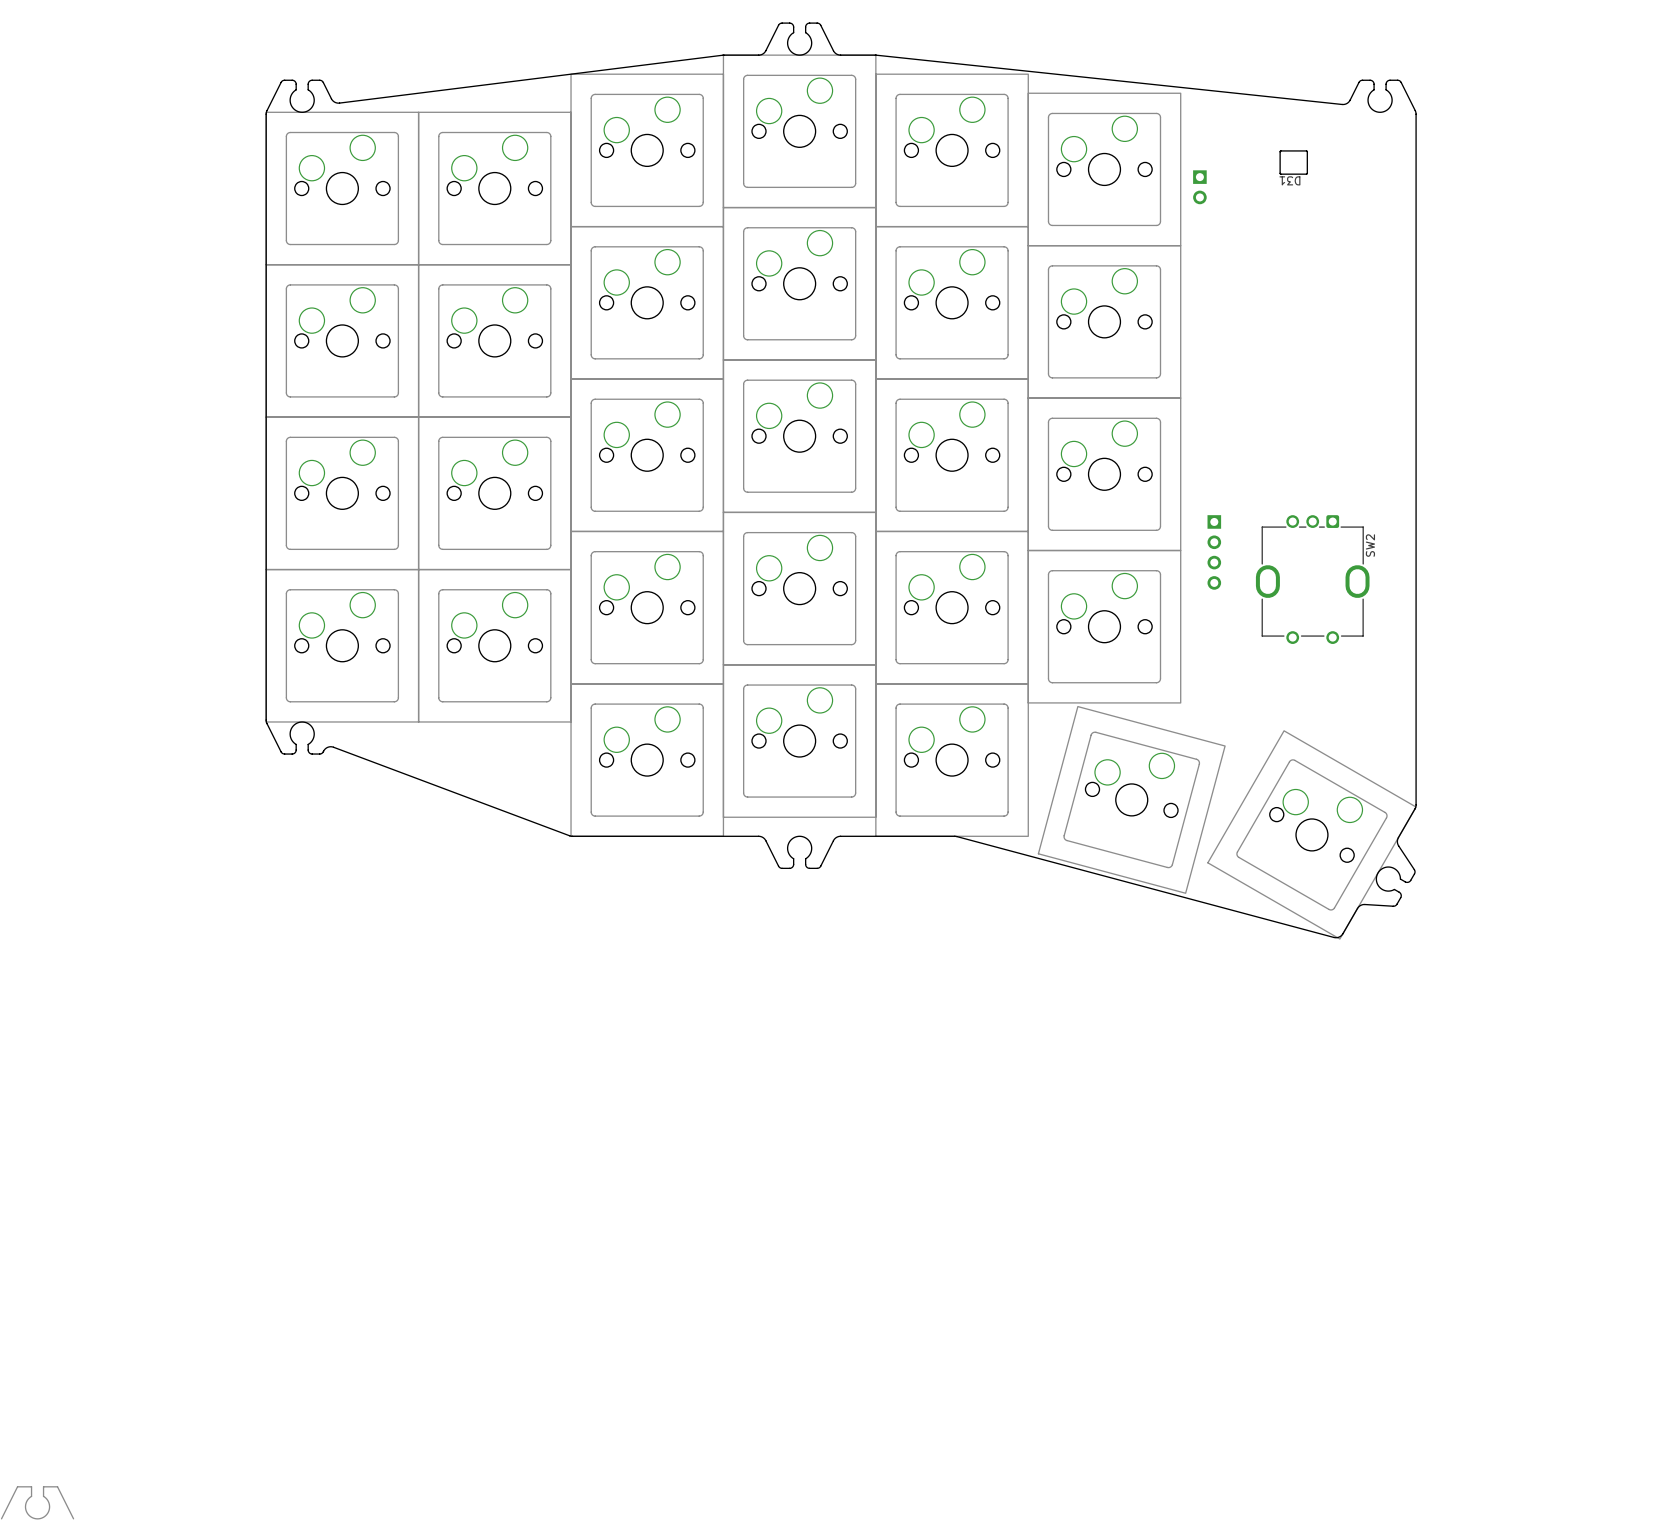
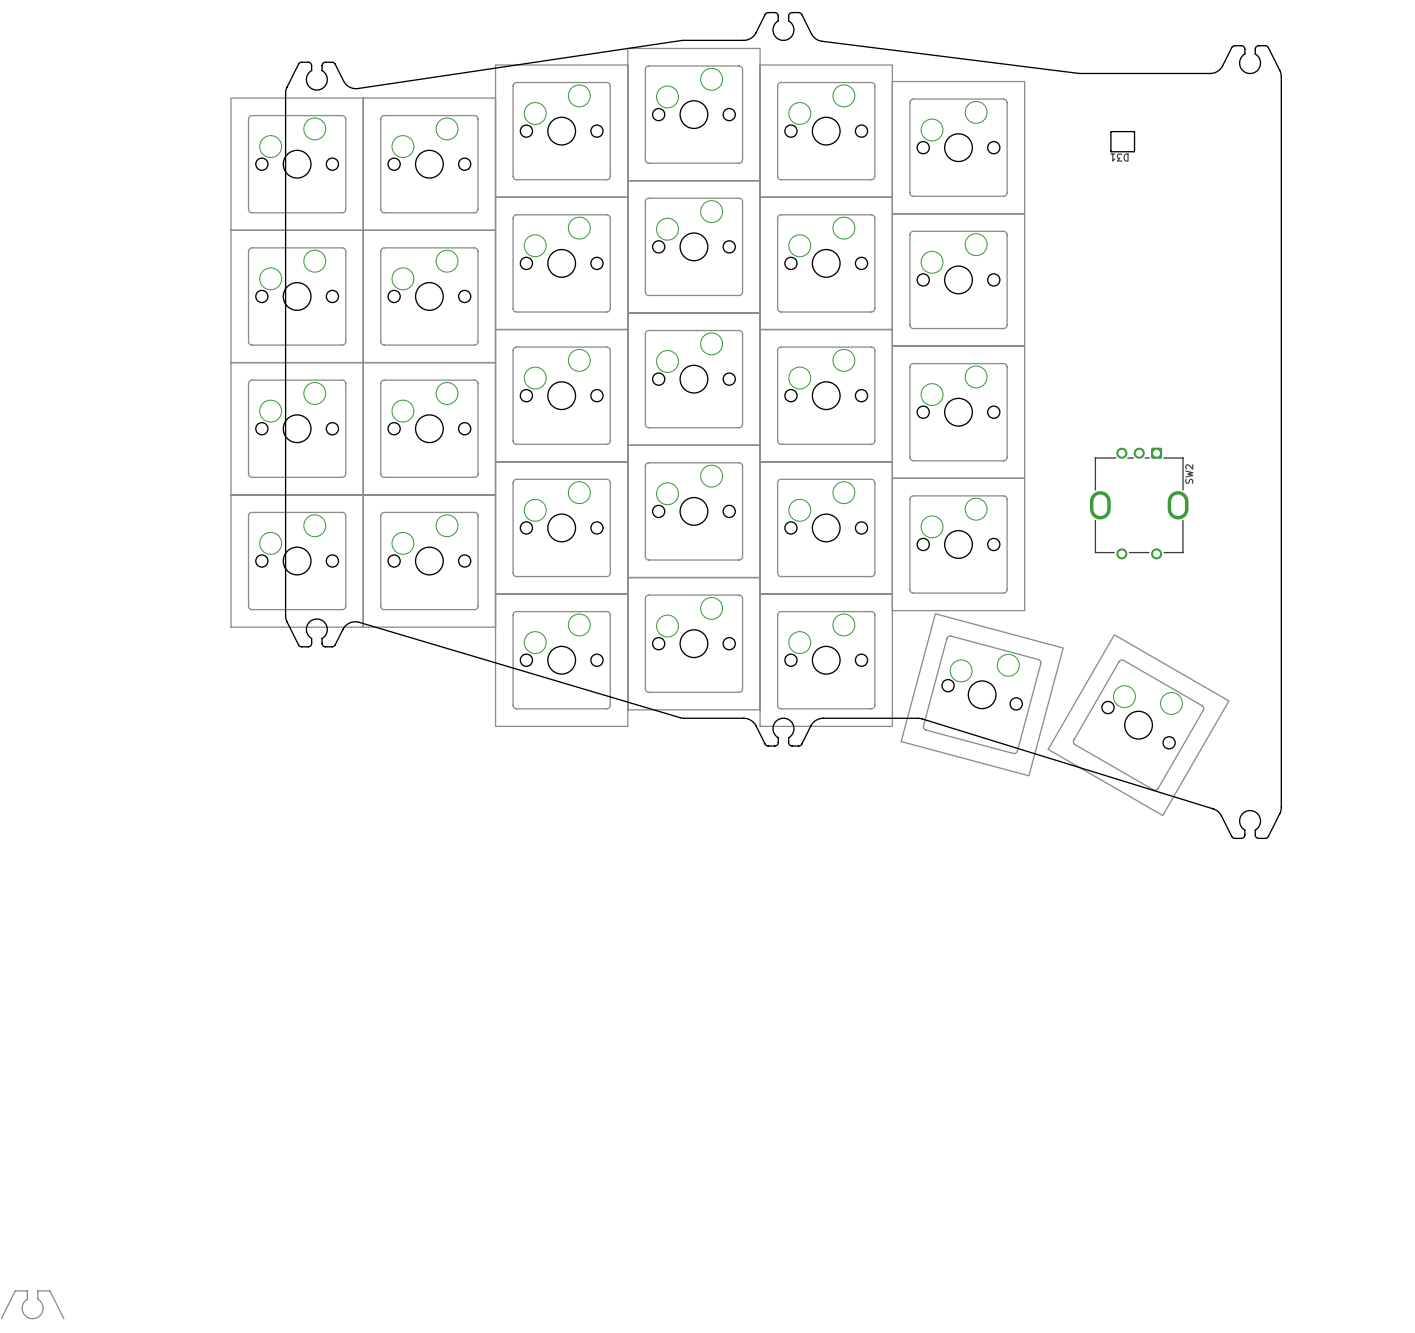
board edge: (782, 23) (793, 25) (793, 32) (788, 38) (787, 45) (791, 51) (798, 55) (805, 53) (811, 46) (811, 39) (805, 32) (806, 24) (817, 23) (820, 24) (833, 51) (839, 55) (876, 55) (1342, 104) (1349, 101) (1360, 81) (1370, 80) (1373, 82) (1374, 89) (1369, 95) (1368, 102) (1371, 109) (1378, 112) (1387, 110) (1391, 104) (1391, 95) (1386, 89) (1386, 81) (1397, 80) (1400, 82) (1416, 114) (1416, 804) (1397, 841) (1414, 870) (1414, 873) (1410, 881) (1406, 882) (1400, 879) (1396, 869) (1387, 867) (1379, 870) (1376, 877) (1377, 883) (1381, 889) (1388, 891) (1394, 889) (1400, 893) (1400, 897) (1395, 905) (1360, 905) (1342, 934) (1334, 937) (954, 836) (838, 836) (833, 839) (820, 866) (817, 868) (806, 866) (805, 858) (810, 853) (811, 844) (806, 838) (798, 836) (791, 839) (787, 845) (788, 853) (793, 858) (793, 866) (781, 868) (778, 866) (765, 839) (759, 836) (570, 836) (333, 747) (326, 747) (320, 753) (310, 753) (308, 744) (313, 738) (313, 731) (311, 726) (305, 722) (296, 723) (290, 730) (290, 737) (296, 744) (295, 752) (284, 754) (281, 752) (266, 720) (266, 114) (281, 82) (284, 80) (295, 81) (296, 89) (290, 96) (290, 104) (295, 110) (303, 112) (310, 109) (313, 102) (313, 95) (308, 89) (308, 82) (311, 80) (322, 81) (331, 99) (338, 103) (722, 55) (759, 55) (765, 51) (778, 24) (782, 23) -> (768, 12) (765, 14) (754, 35) (746, 40) (681, 40) (358, 88) (351, 87) (345, 83) (334, 62) (325, 62) (322, 64) (322, 70) (326, 76) (326, 84) (320, 89) (313, 89) (308, 85) (306, 80) (307, 75) (311, 70) (311, 63) (308, 62) (298, 63) (285, 93) (285, 615) (298, 645) (308, 646) (311, 645) (311, 638) (307, 633) (306, 628) (308, 623) (313, 619) (320, 619) (326, 624) (326, 632) (322, 638) (322, 644) (325, 646) (334, 646) (345, 625) (357, 621) (681, 717) (748, 719) (754, 723) (767, 746) (777, 744) (778, 737) (773, 732) (773, 726) (776, 721) (782, 718) (788, 719) (793, 725) (792, 732) (788, 737) (788, 743) (792, 746) (801, 745) (811, 724) (820, 718) (921, 718) (1214, 809) (1220, 814) (1234, 838) (1242, 838) (1244, 835) (1244, 830) (1239, 822) (1241, 815) (1246, 811) (1253, 811) (1258, 815) (1260, 820) (1258, 826) (1255, 830) (1255, 836) (1267, 837) (1281, 807) (1281, 76) (1268, 47) (1258, 45) (1255, 47) (1255, 54) (1259, 58) (1260, 65) (1257, 70) (1251, 73) (1245, 72) (1240, 66) (1240, 59) (1244, 54) (1244, 47) (1234, 45) (1231, 47) (1220, 68) (1213, 73) (1079, 73) (820, 40) (812, 35) (799, 12) (789, 14) (788, 20) (793, 26) (793, 33) (788, 39) (780, 40) (775, 36) (773, 30) (774, 24) (778, 20) (777, 14) (768, 12)
part: (1199, 187) -> none
part: (1214, 552) -> none

